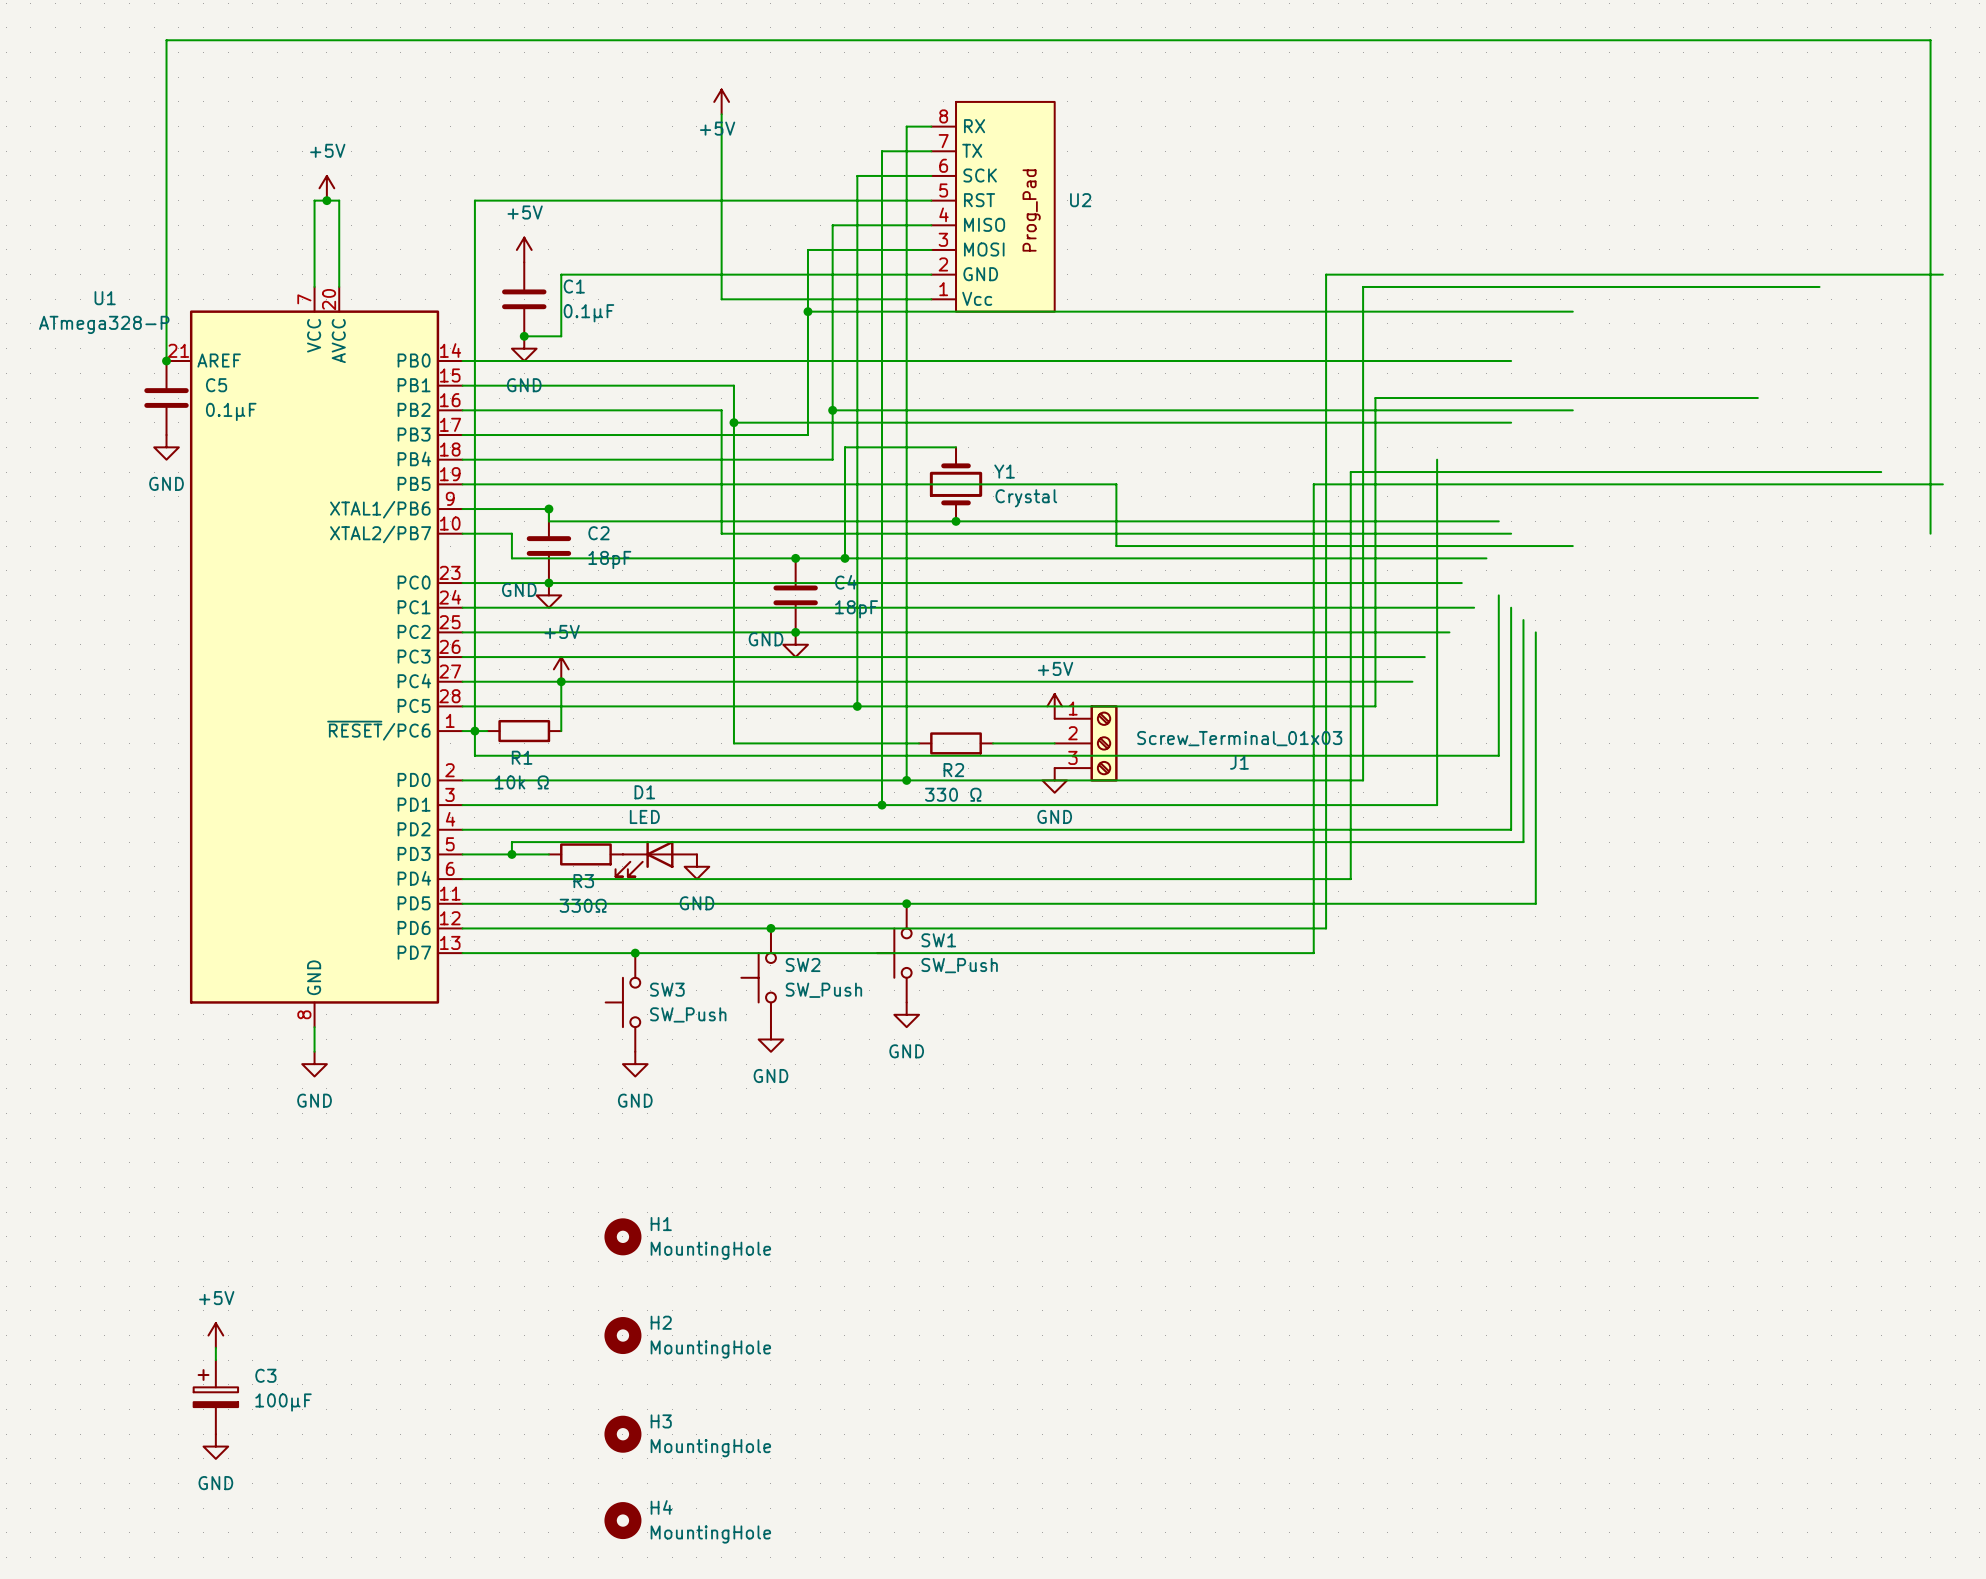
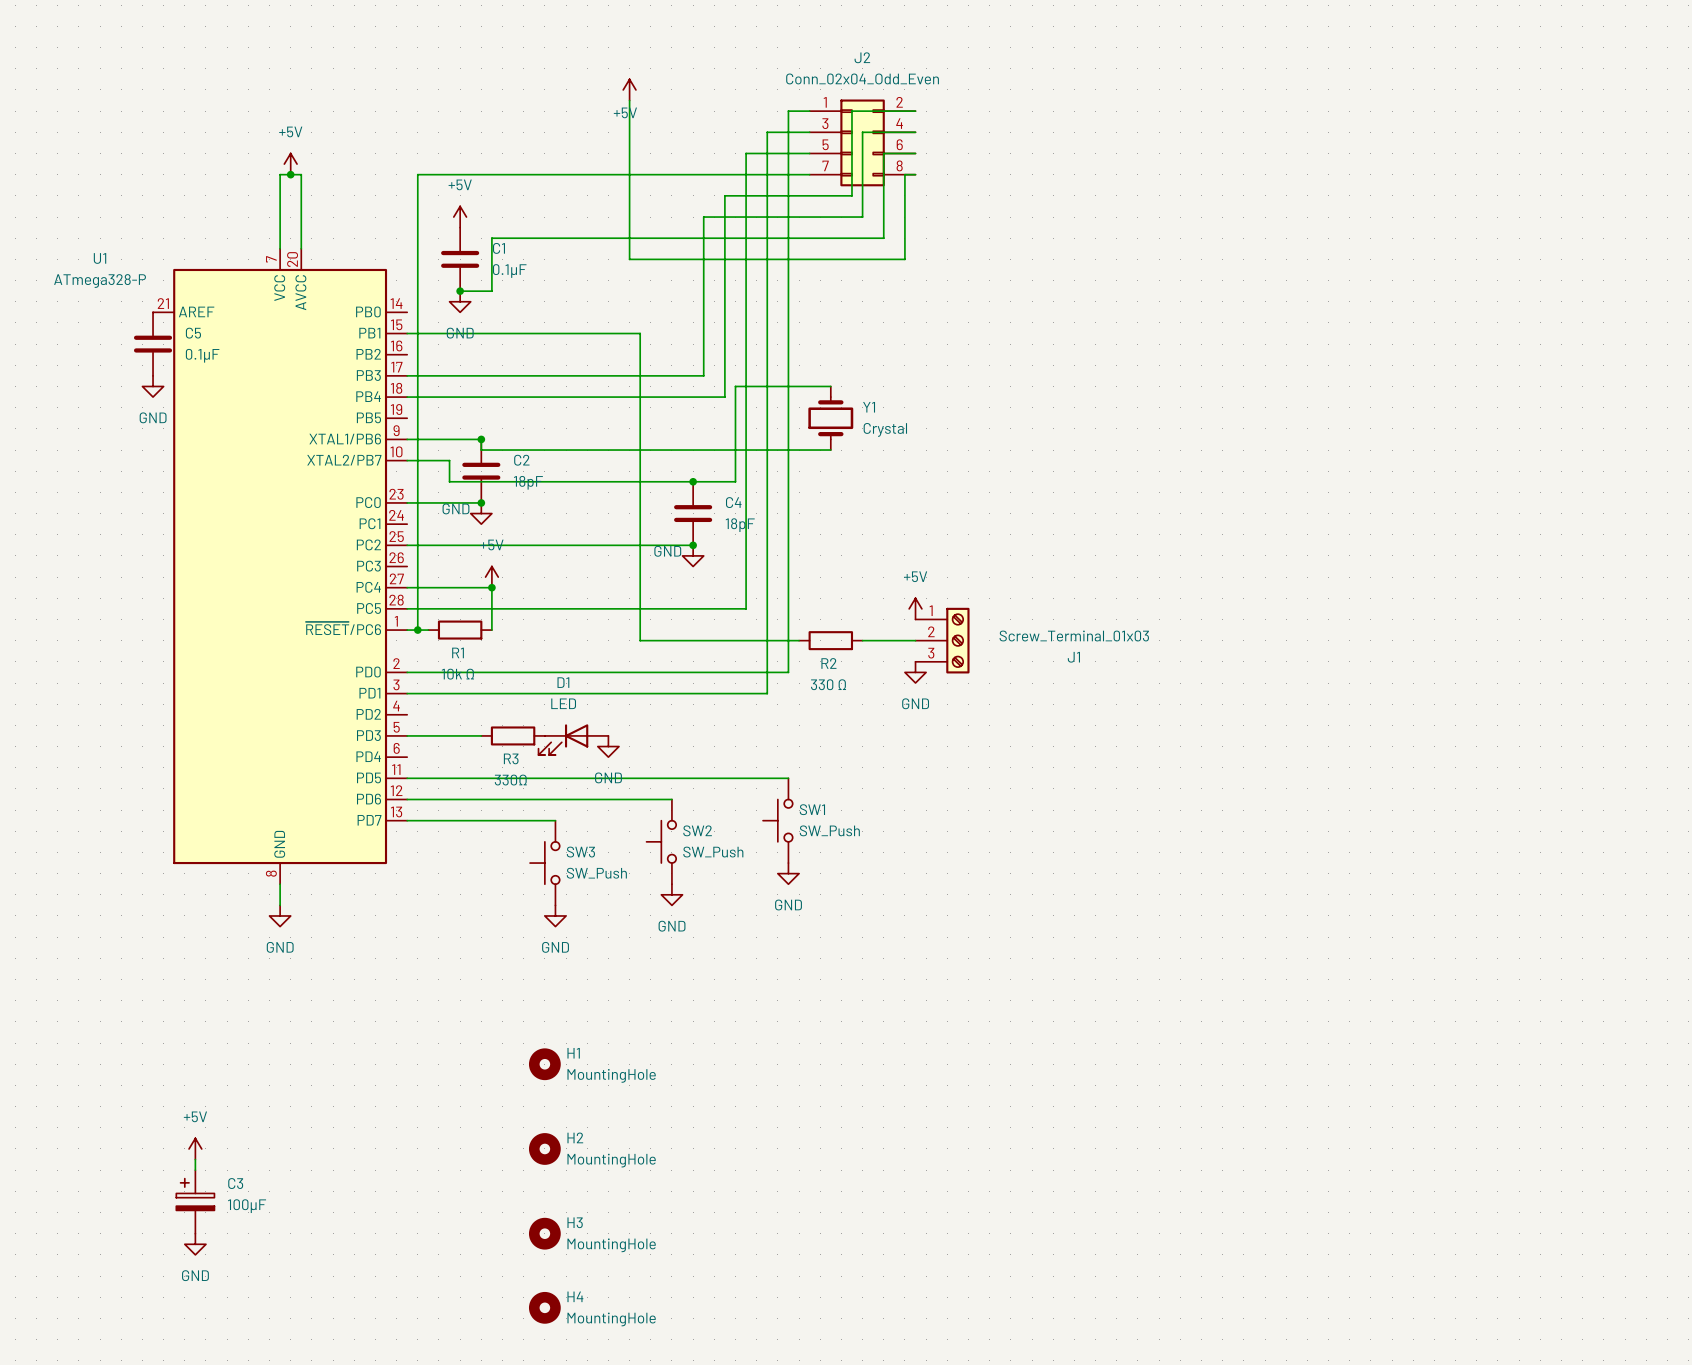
J2: none -> Conn_02x04_Odd_Even (862, 142)
U2: (993, 206) -> none
wire: (1942, 274) (1326, 274) (1326, 928) (770, 928) -> none
wire: (1819, 286) (1363, 286) (1363, 780) (906, 780) -> none
wire: (807, 311) (1572, 311) -> none
junction: (807, 311) -> none
wire: (166, 360) (166, 40) (1930, 40) (1930, 533) -> none
junction: (166, 360) -> none
wire: (462, 360) (1511, 360) -> none
wire: (1757, 398) (1375, 398) (1375, 706) (857, 706) -> none
wire: (462, 410) (721, 410) (721, 533) (1511, 533) -> none
wire: (832, 410) (1572, 410) -> none
junction: (832, 410) -> none
wire: (733, 422) (1511, 422) -> none
junction: (733, 422) -> none
wire: (1437, 459) (1437, 805) (882, 805) -> none
wire: (1881, 472) (1350, 472) (1350, 879) (462, 879) -> none
wire: (462, 484) (1116, 484) (1116, 546) (1572, 546) -> none
wire: (1942, 484) (1313, 484) (1313, 953) (635, 953) -> none
wire: (956, 521) (1498, 521) -> none
junction: (956, 521) -> none
wire: (844, 558) (1486, 558) -> none
junction: (844, 558) -> none
wire: (548, 583) (1461, 583) -> none
wire: (1498, 595) (1498, 755) (474, 755) (474, 731) -> none
wire: (462, 607) (1474, 607) -> none
wire: (1511, 607) (1511, 829) (462, 829) -> none
wire: (1523, 620) (1523, 842) (511, 842) (511, 854) -> none
wire: (795, 632) (1449, 632) -> none
wire: (1535, 632) (1535, 903) (906, 903) -> none
wire: (462, 657) (1424, 657) -> none
wire: (561, 681) (1412, 681) -> none
junction: (857, 706) -> none
junction: (906, 780) -> none
junction: (882, 805) -> none
junction: (511, 854) -> none
junction: (906, 903) -> none
junction: (770, 928) -> none
junction: (635, 953) -> none

